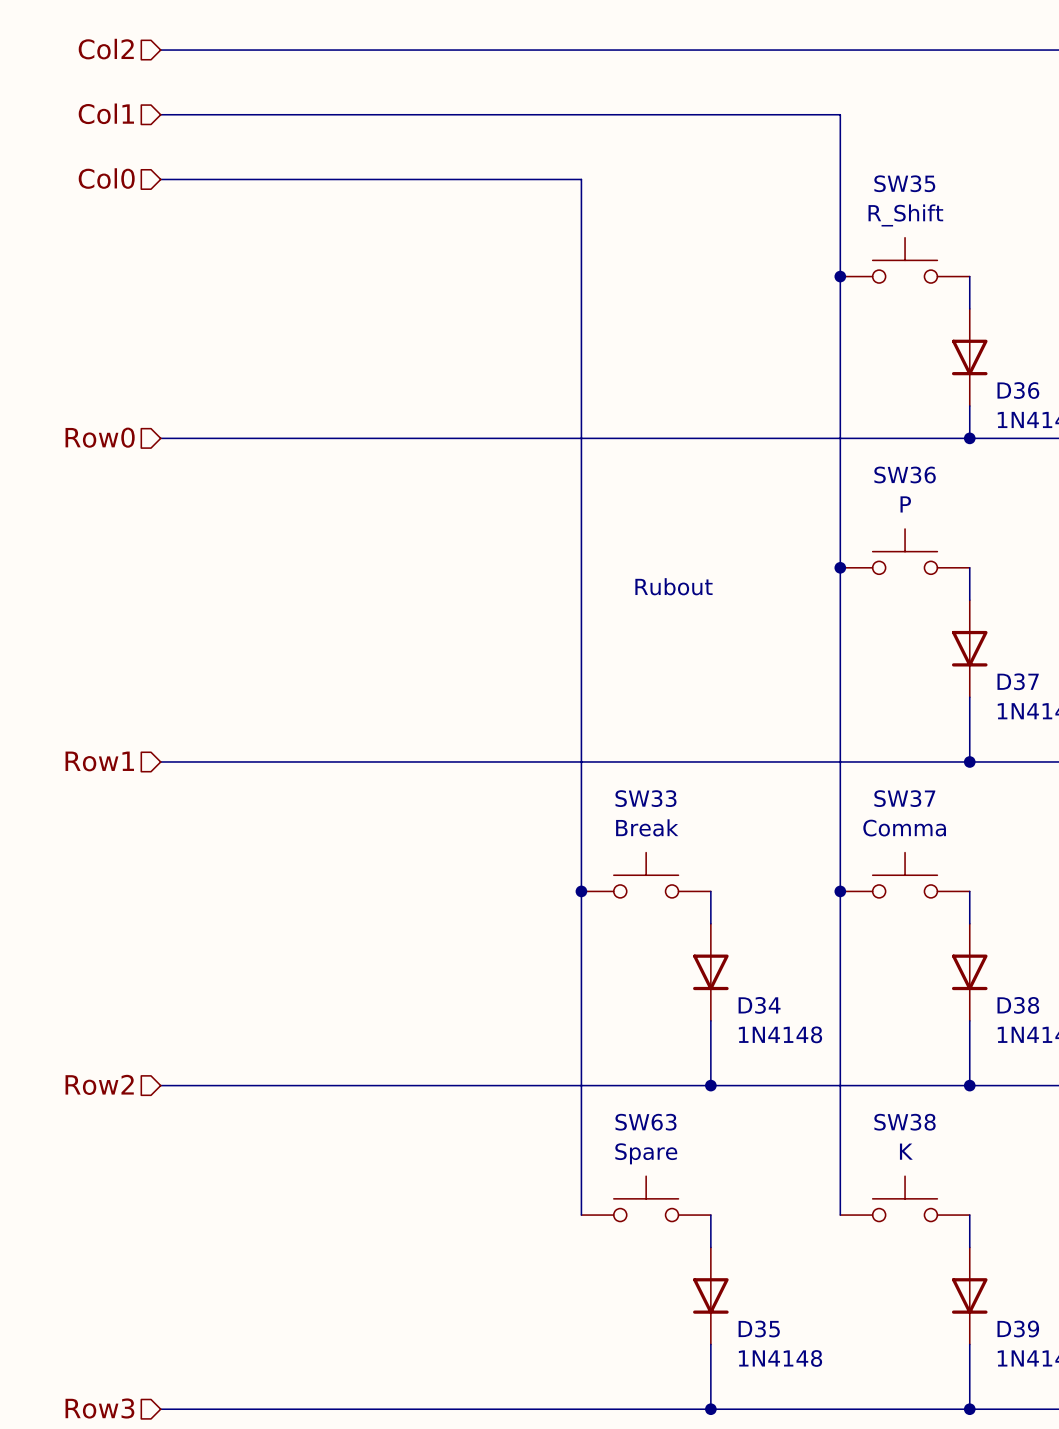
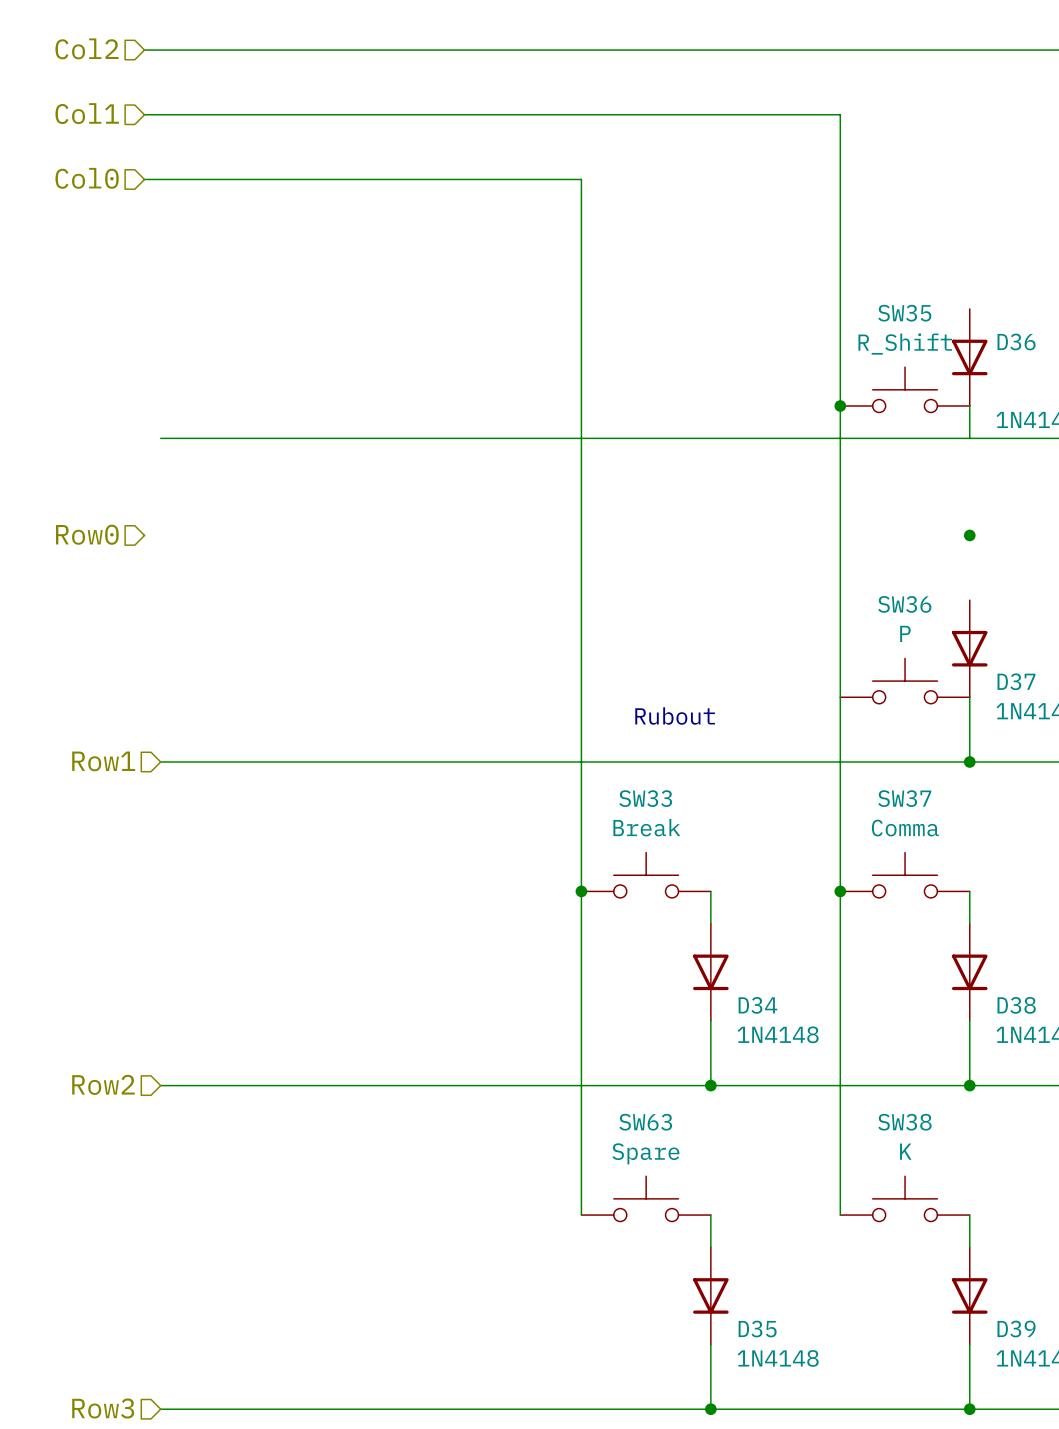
hierarchical label position: Col2 (106, 49) -> Col2 (86, 48)
wire: none -> (144, 50) (160, 50)
hierarchical label position: Col1 (106, 113) -> Col1 (87, 113)
wire: none -> (144, 114) (160, 114)
hierarchical label position: Col0 (106, 178) -> Col0 (87, 178)
wire: none -> (144, 179) (160, 179)
SW35 position: (905, 260) -> (905, 389)
junction: (840, 276) -> none
wire: (969, 276) (969, 308) -> none
D36 name position: D36 (1018, 390) -> D36 (1016, 341)
junction: none -> (840, 406)
hierarchical label position: Row0 (100, 437) -> Row0 (87, 534)
junction: (969, 438) -> none
junction: none -> (969, 535)
SW36 position: (905, 551) -> (905, 681)
junction: (840, 567) -> none
wire: (969, 567) (969, 600) -> none
text position: Rubout (673, 586) -> Rubout (675, 716)

